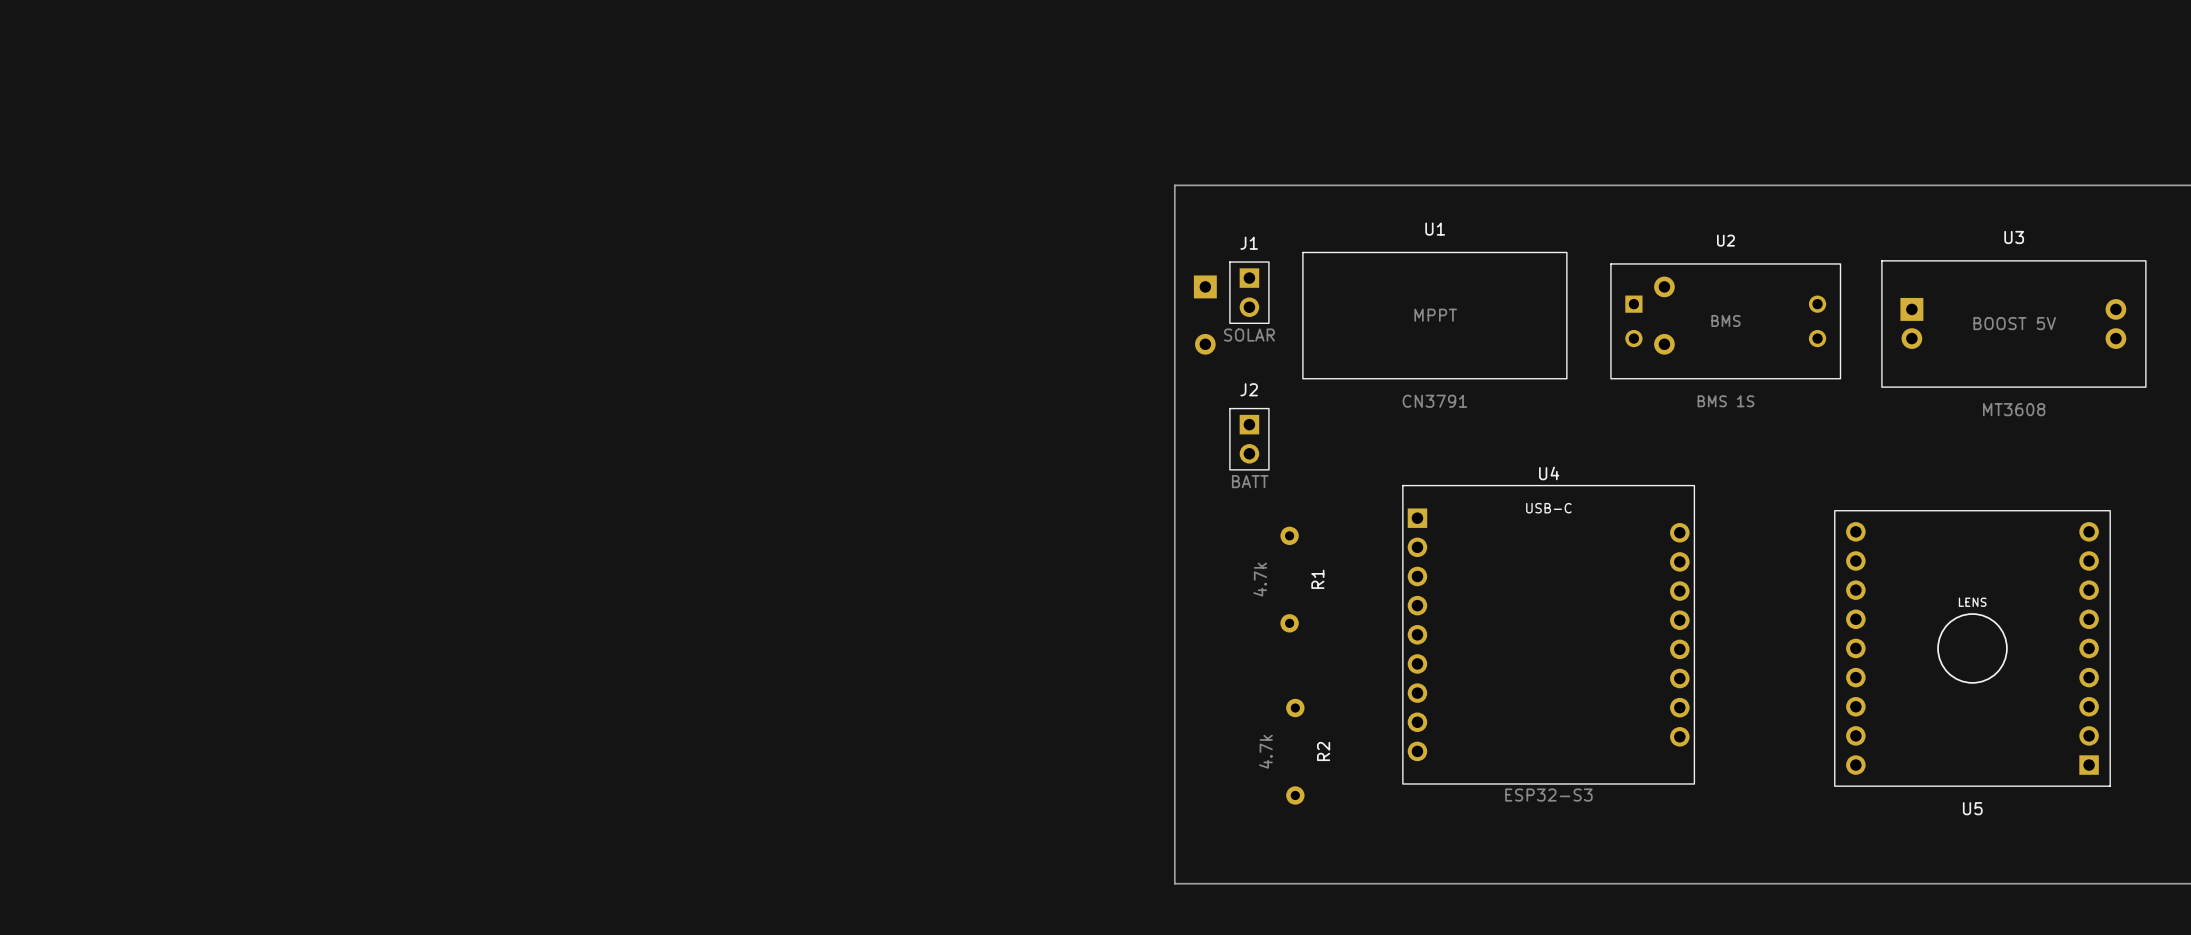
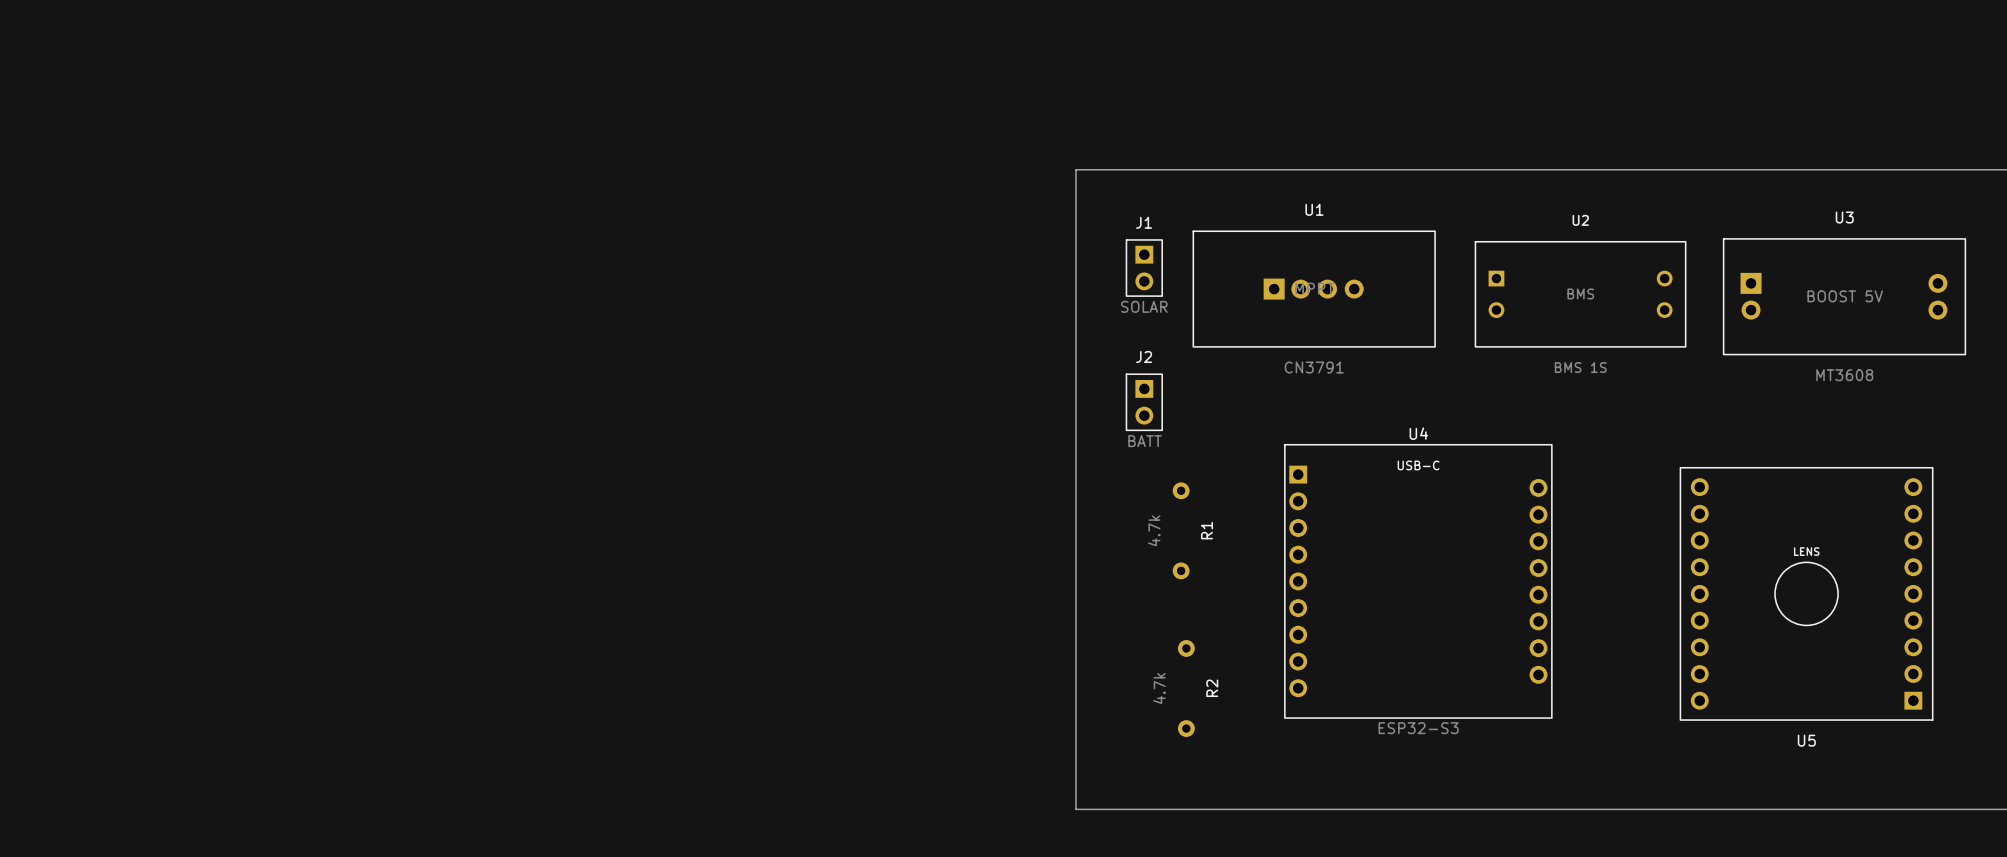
U1 footprint: [1193, 251, 1675, 380] -> [1192, 230, 1436, 348]

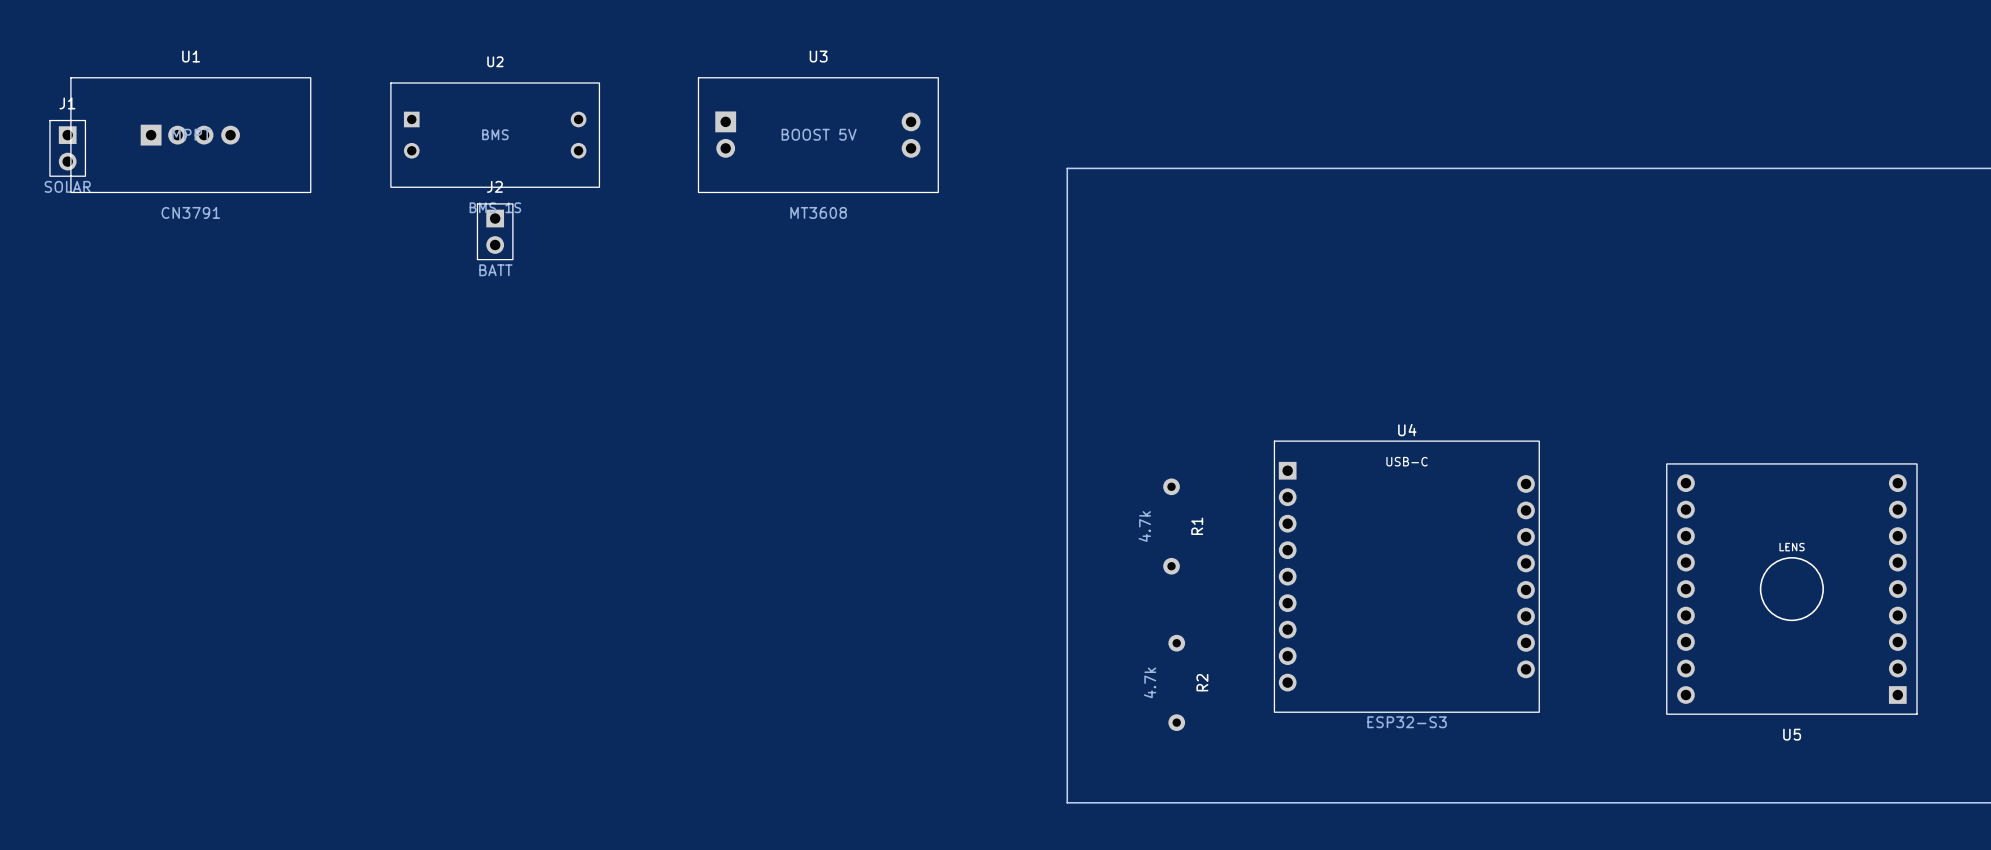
J1 position: (1144, 268) -> (67, 148)
U1 position: (1314, 289) -> (190, 135)
U2 position: (1580, 294) -> (495, 135)
U3 position: (1844, 296) -> (818, 135)
J2 position: (1144, 402) -> (495, 231)

